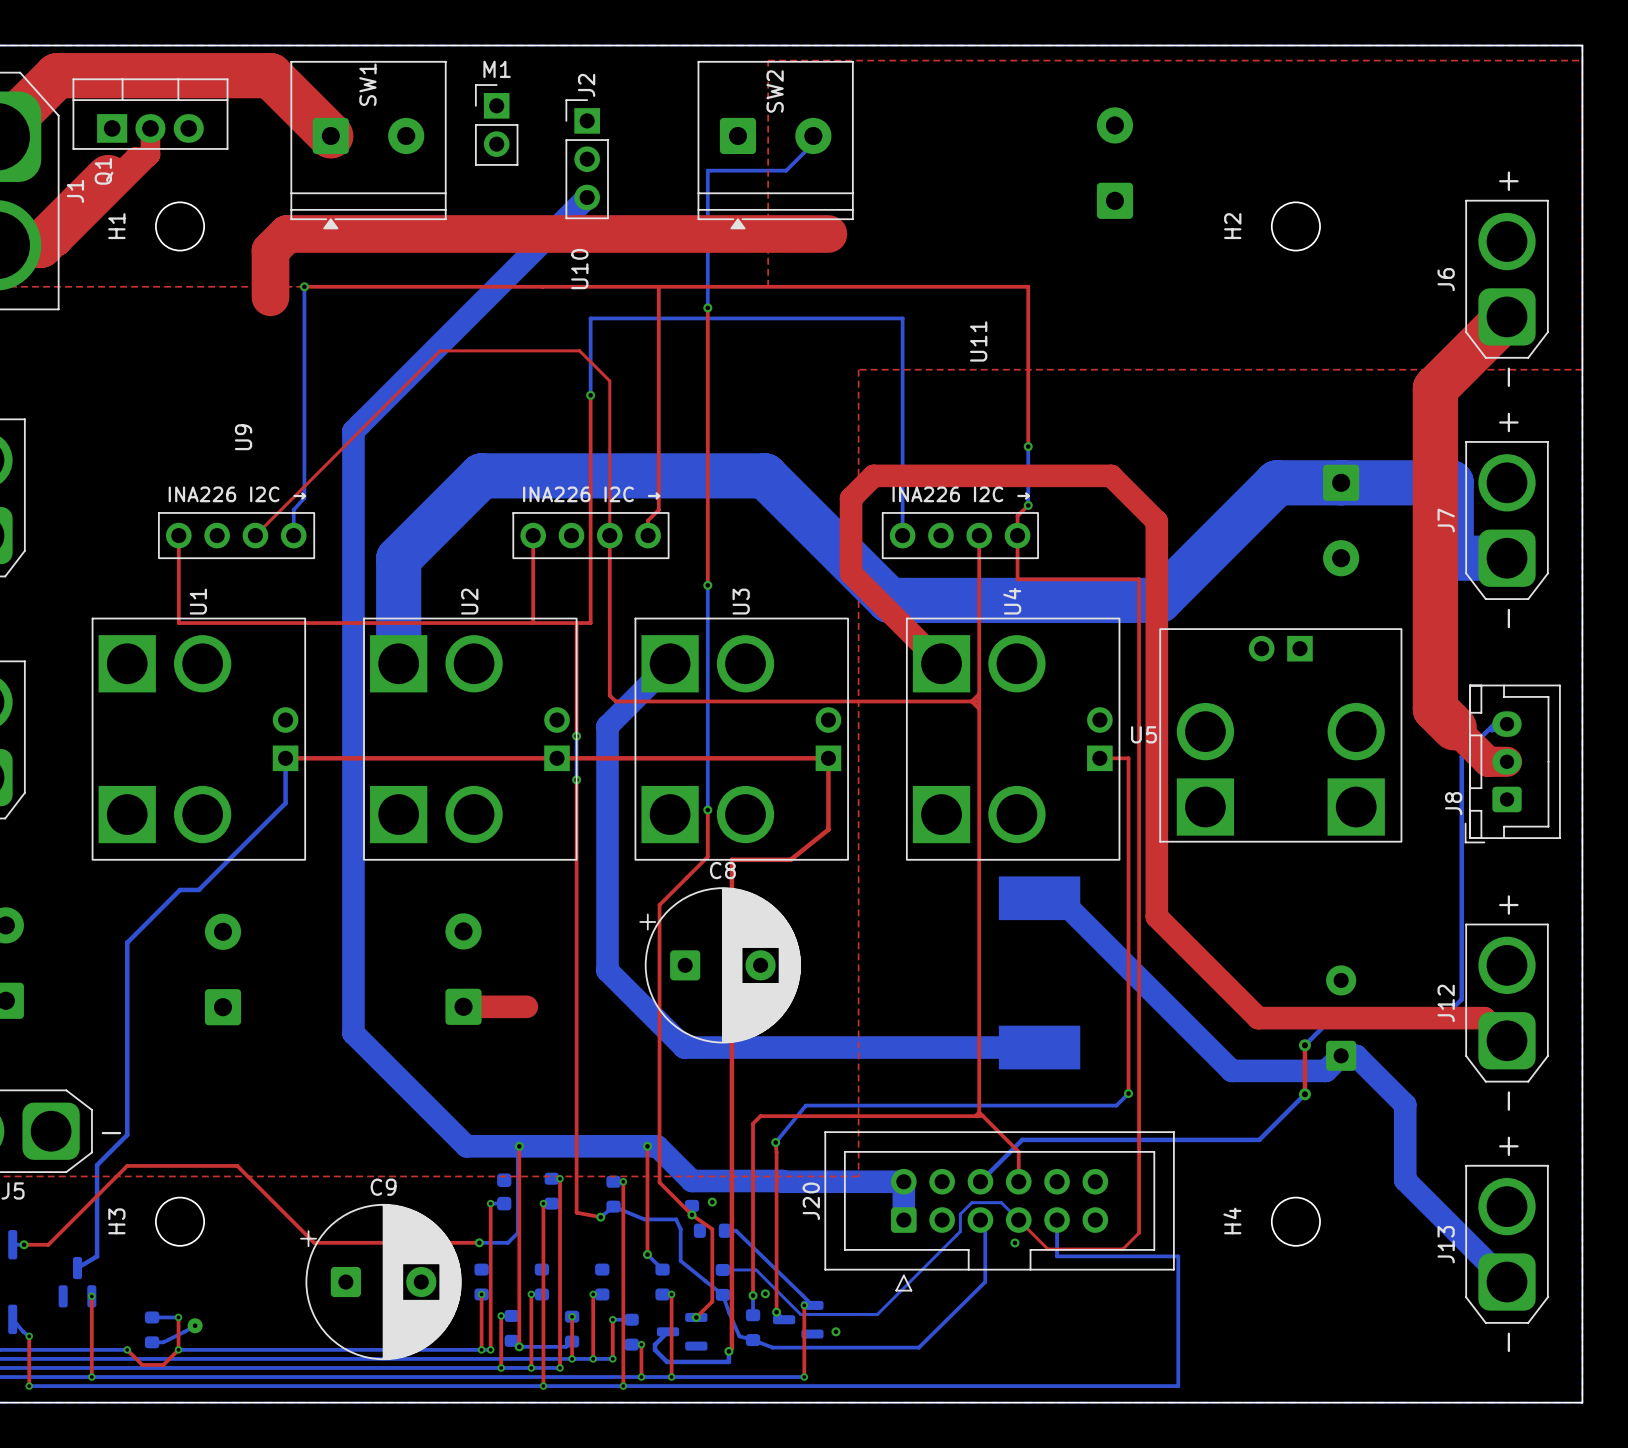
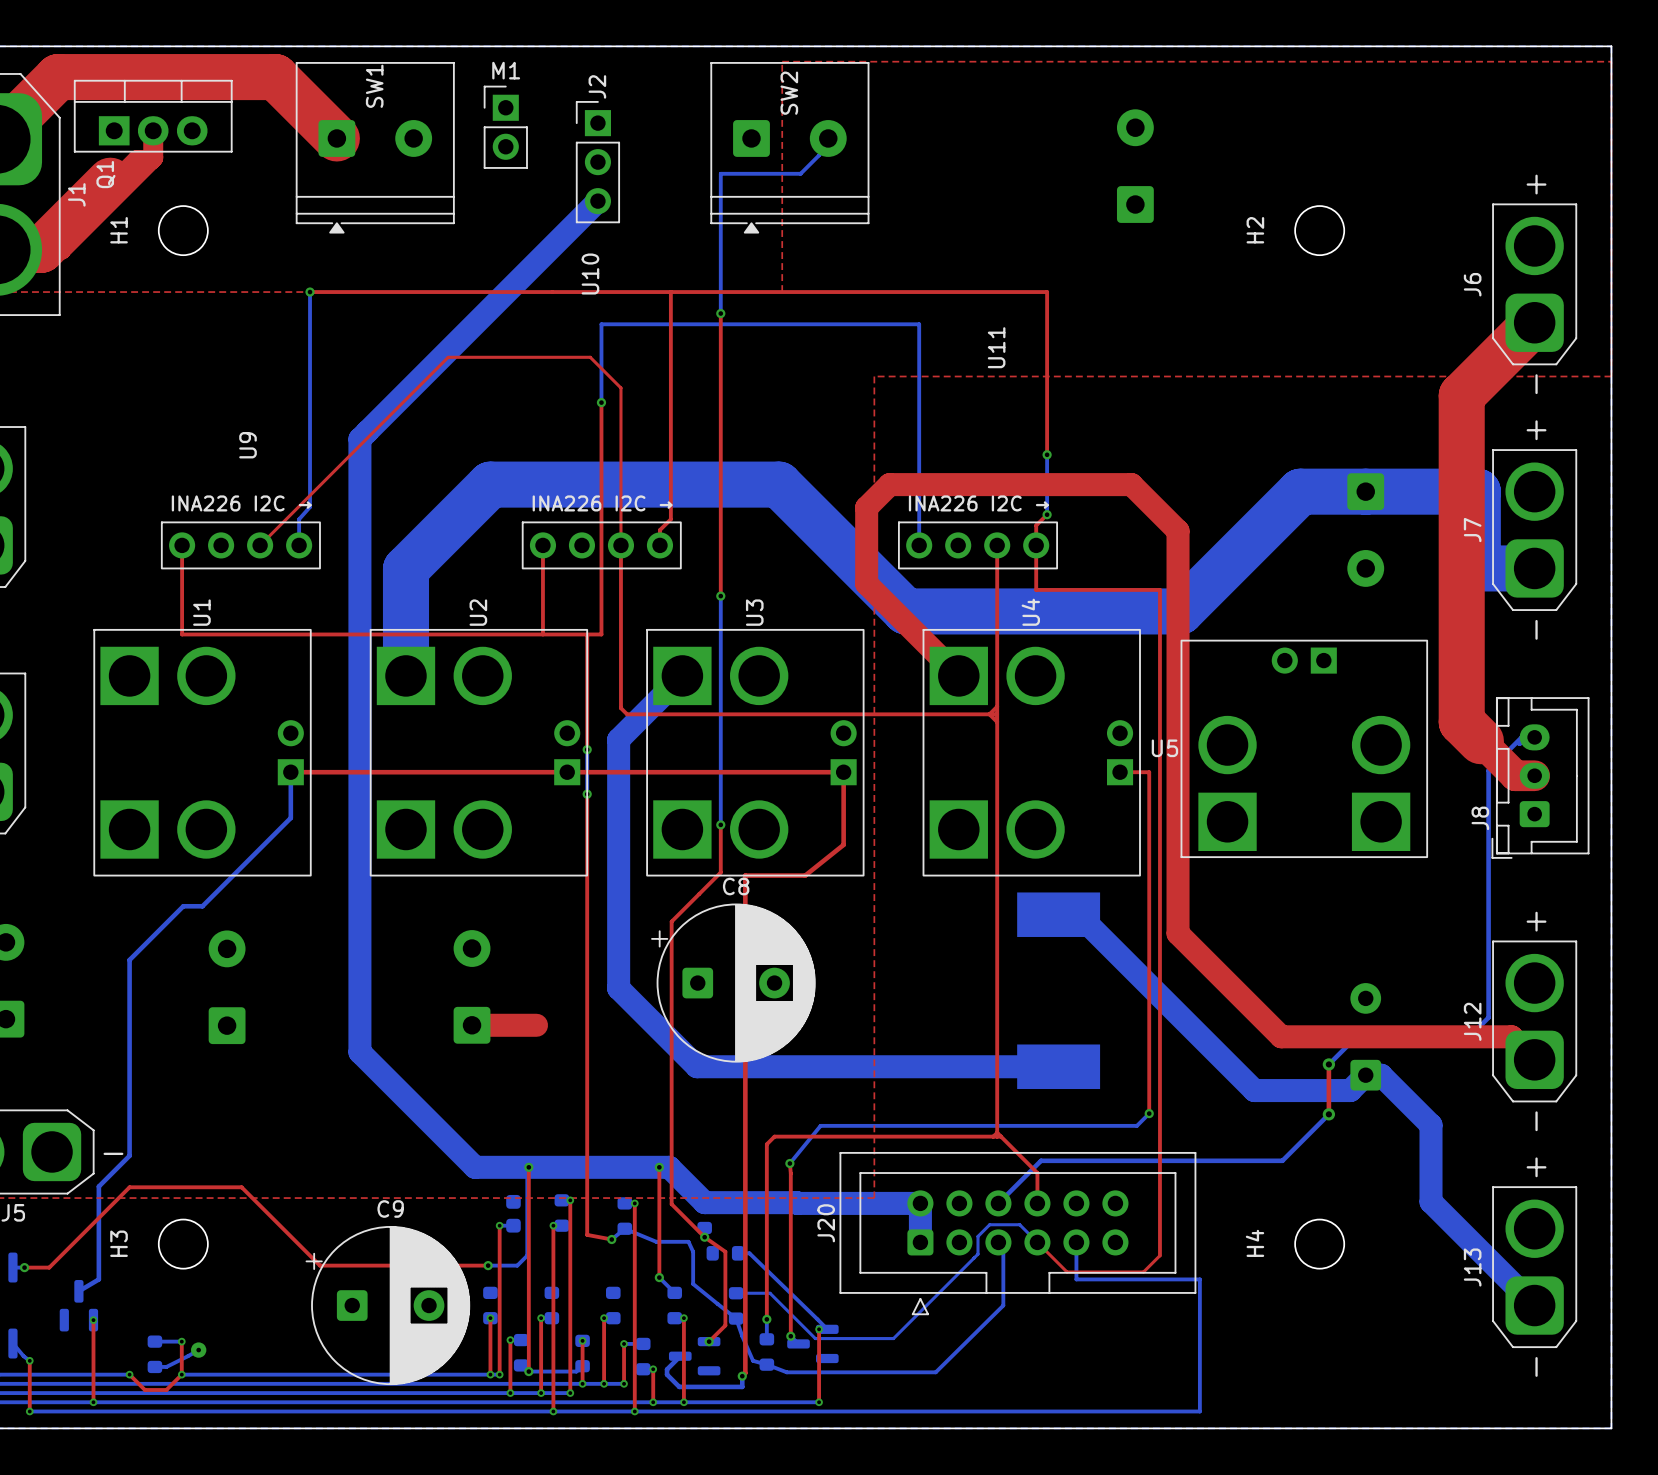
top track: (828, 234) (287, 234) (270, 250) (270, 297) -> none
via: (712, 1202) -> none
via: (1014, 1242) -> none
via: (765, 1293) -> none
via: (835, 1331) -> none

